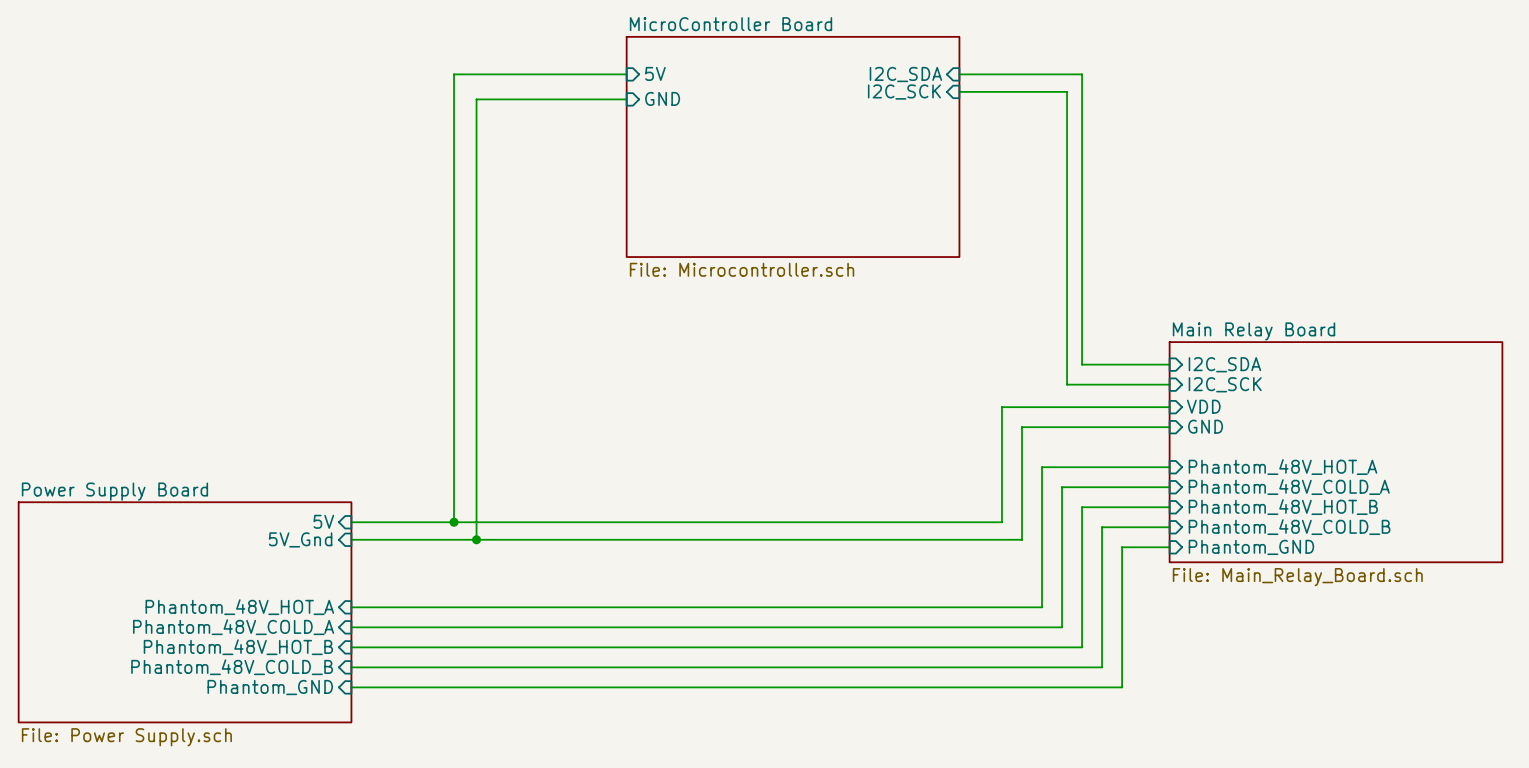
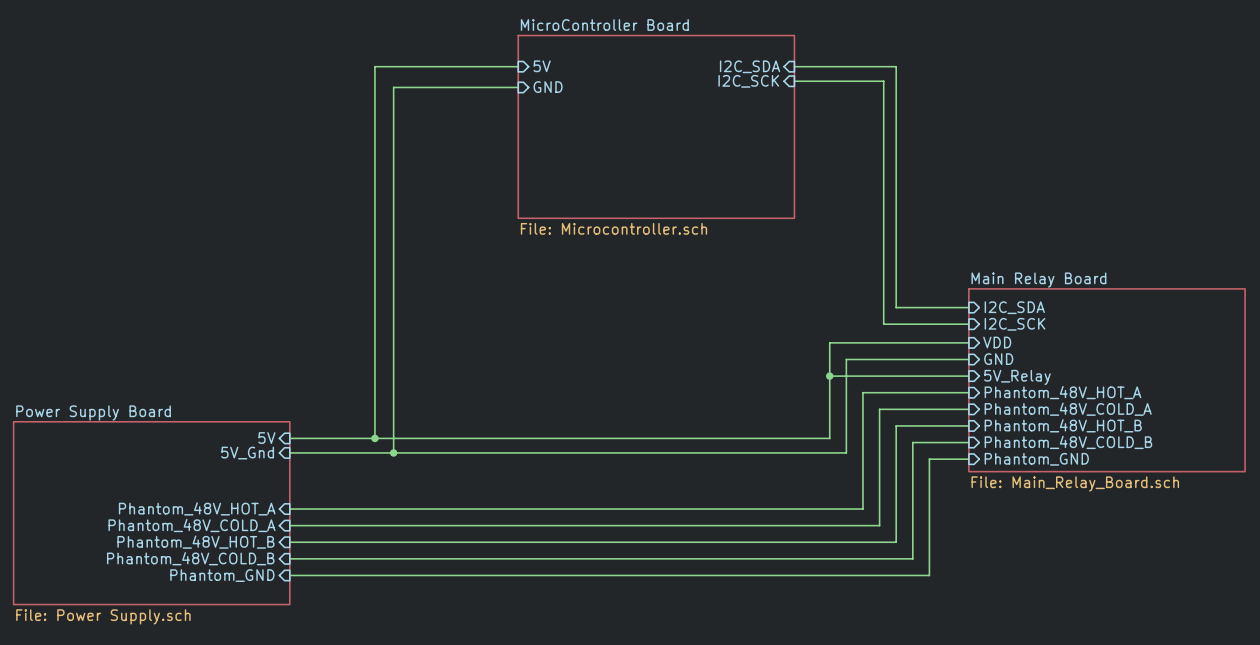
wire: none -> (829, 376) (968, 376)
junction: none -> (829, 376)
sheet pin: none -> 5V_Relay (1017, 377)

